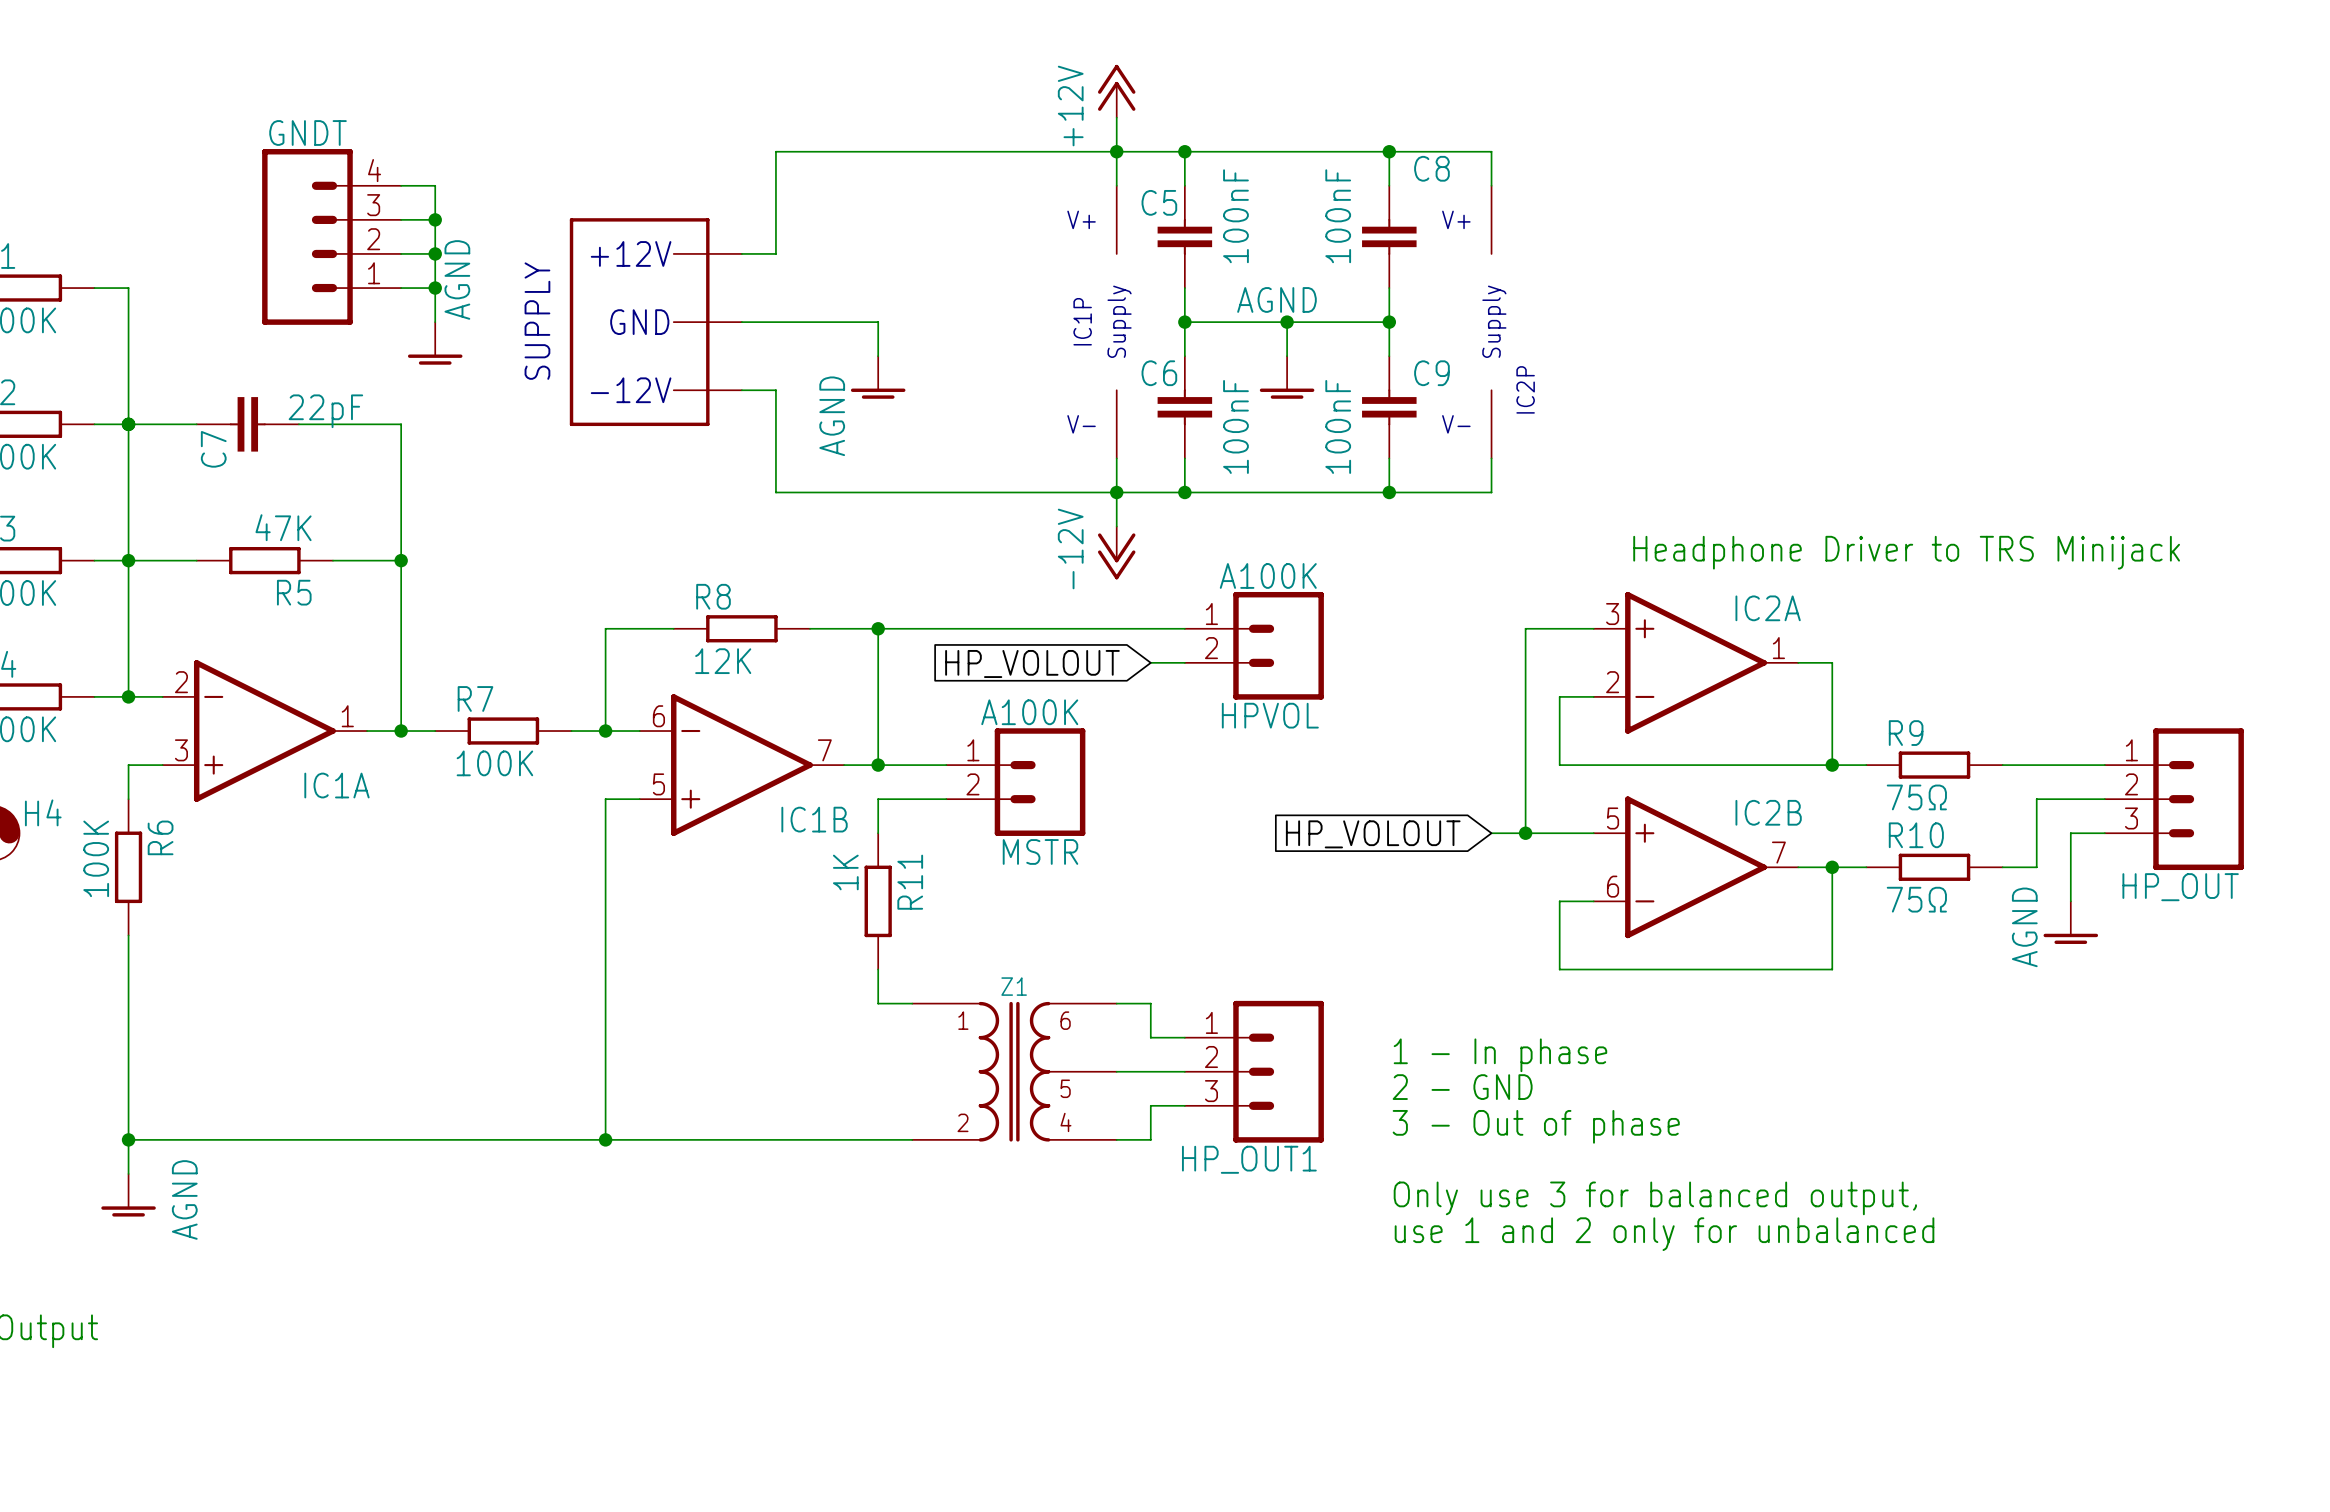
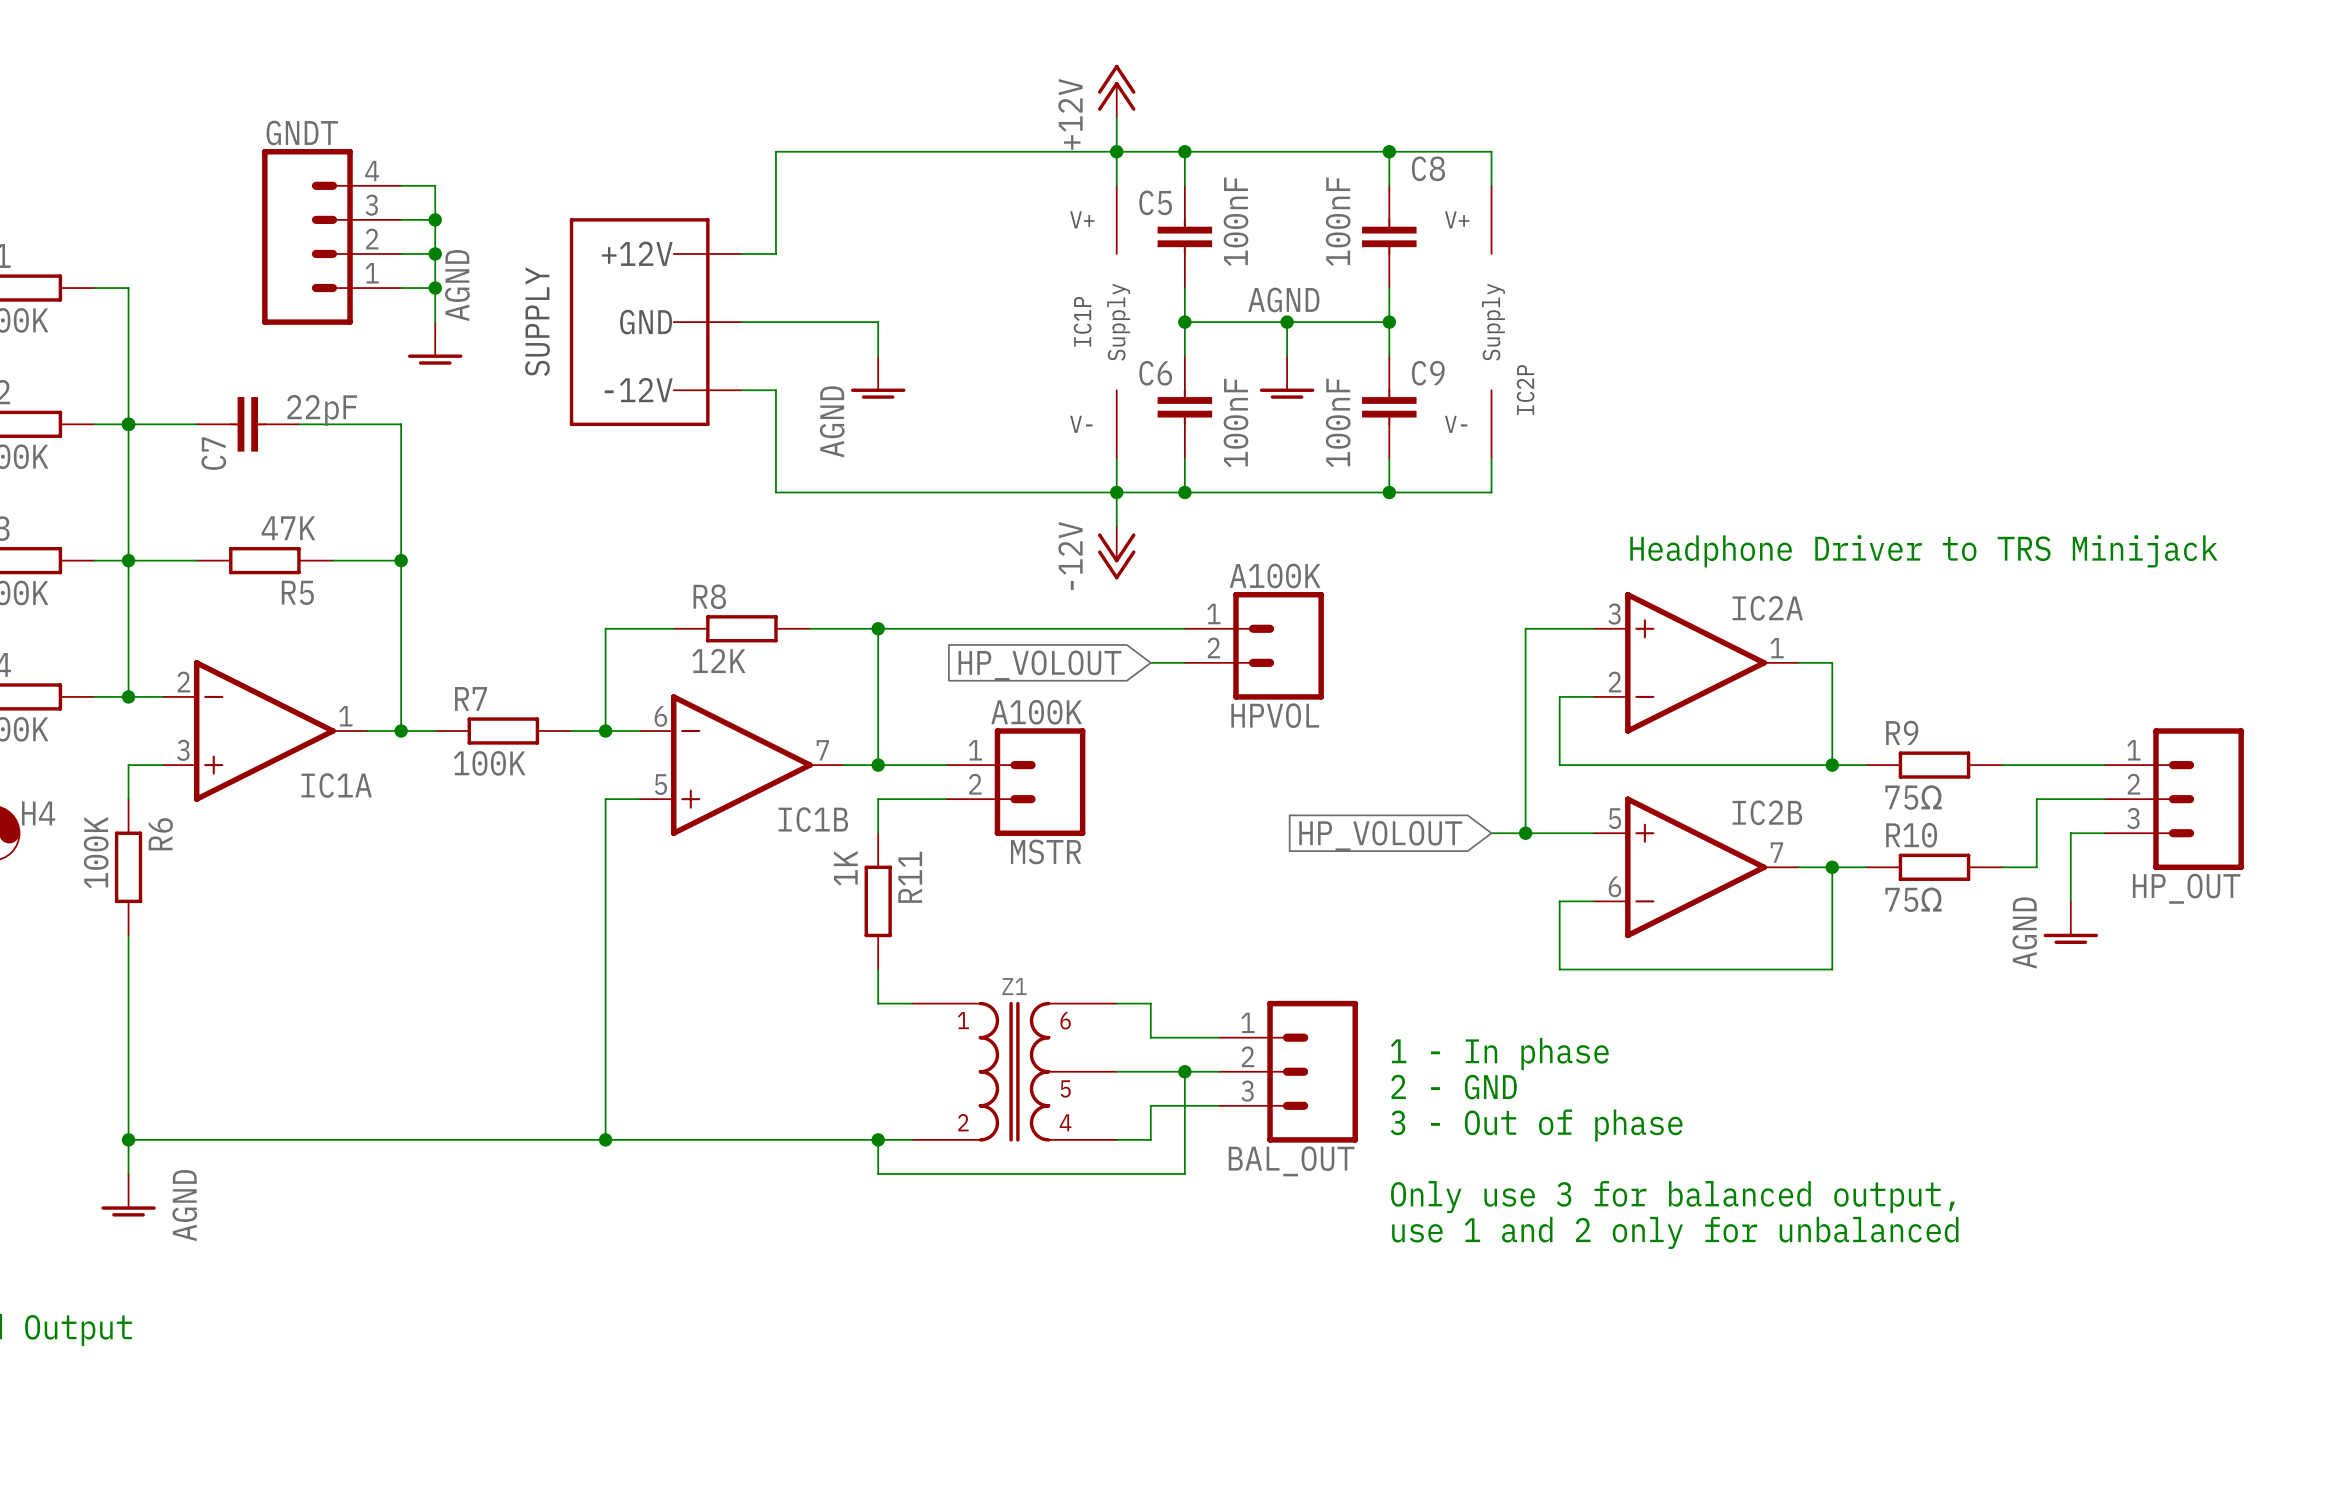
junction: none -> (1184, 1071)
wire: none -> (1218, 1071) (1184, 1071) (1184, 1173) (878, 1173) (878, 1139)
HP_OUT1: (1254, 1071) -> none
BAL_OUT: none -> (1288, 1071)
junction: none -> (878, 1139)

